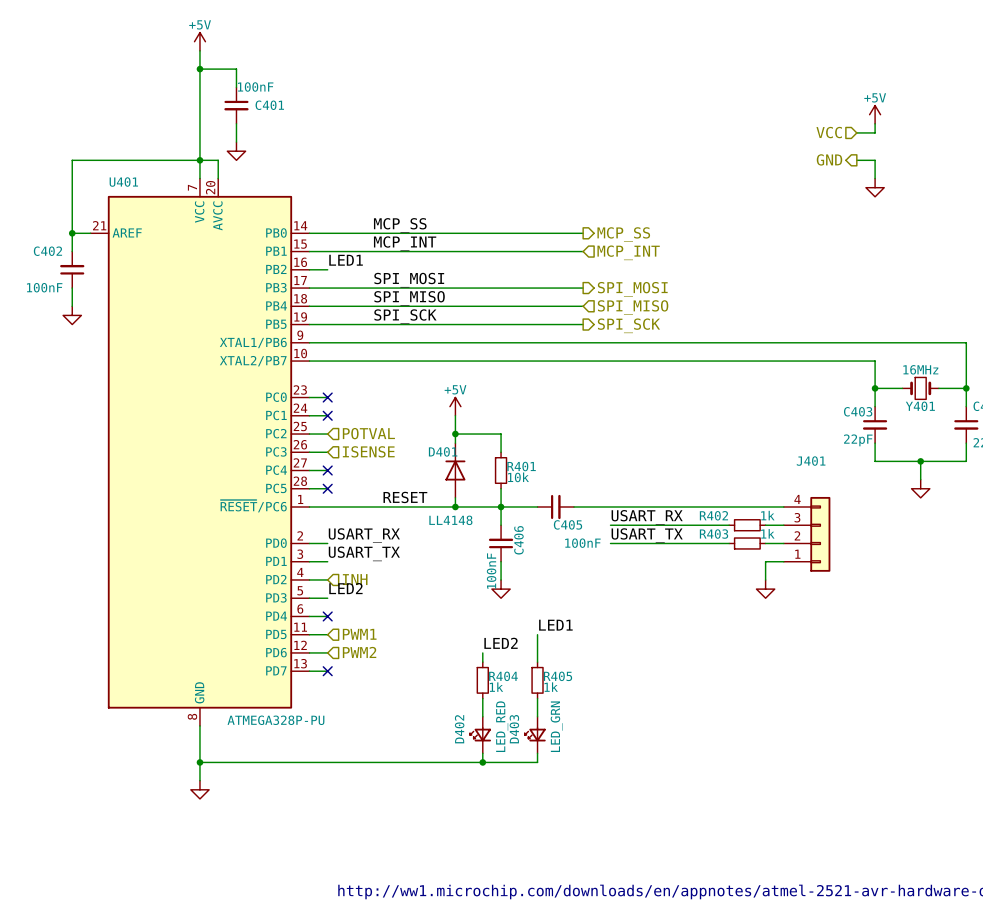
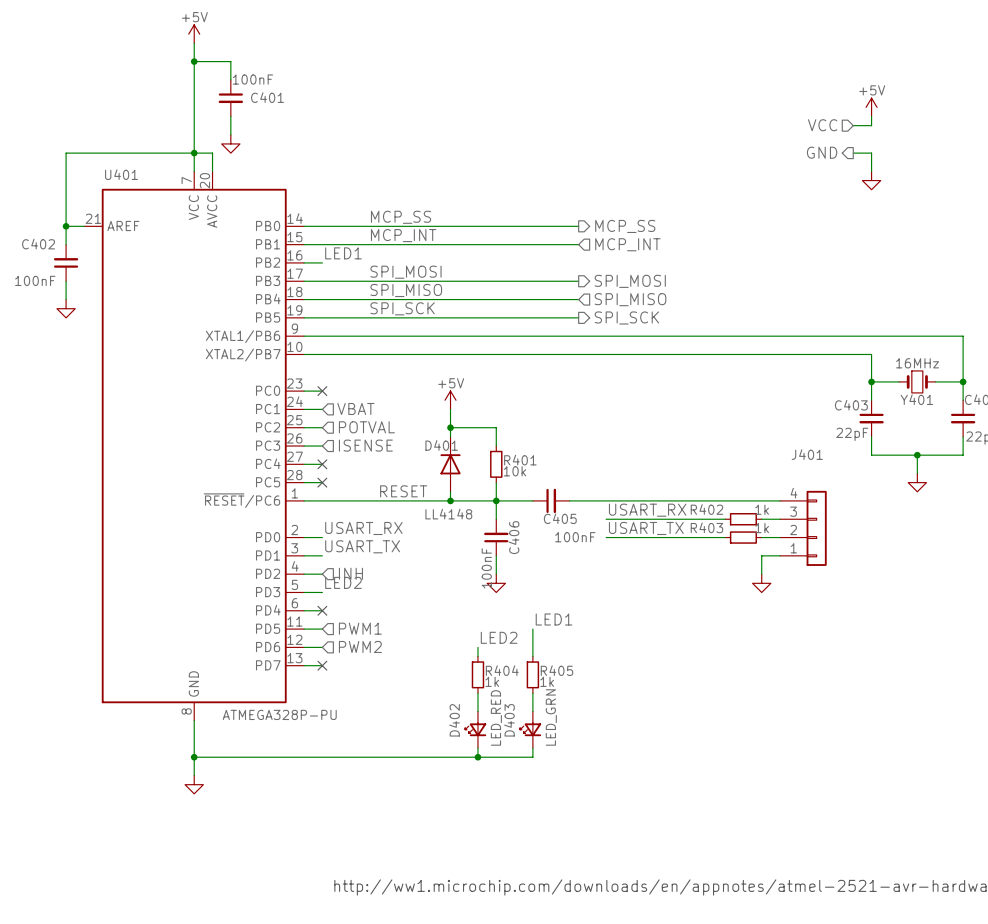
no-connect mark: (327, 415) -> none
hierarchical label: none -> VBAT (355, 408)

